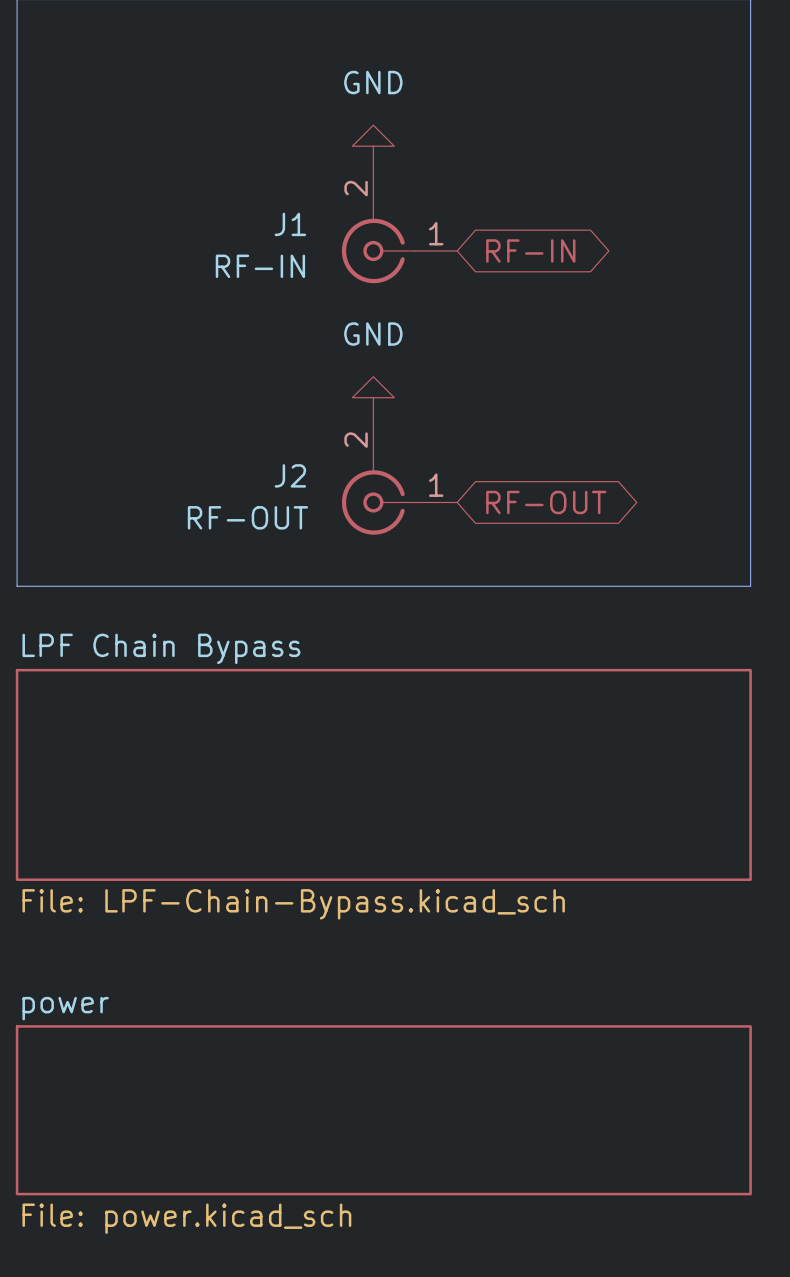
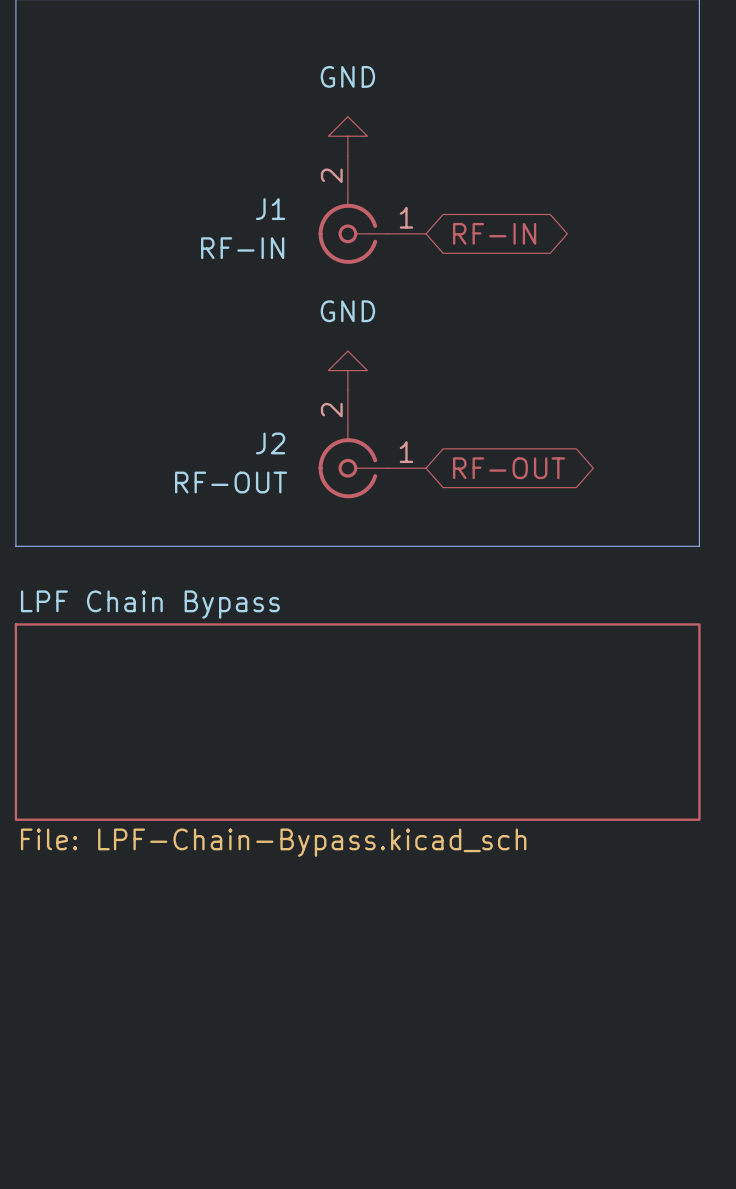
sheet power: File: power.kicad_sch (383, 1110) -> none

